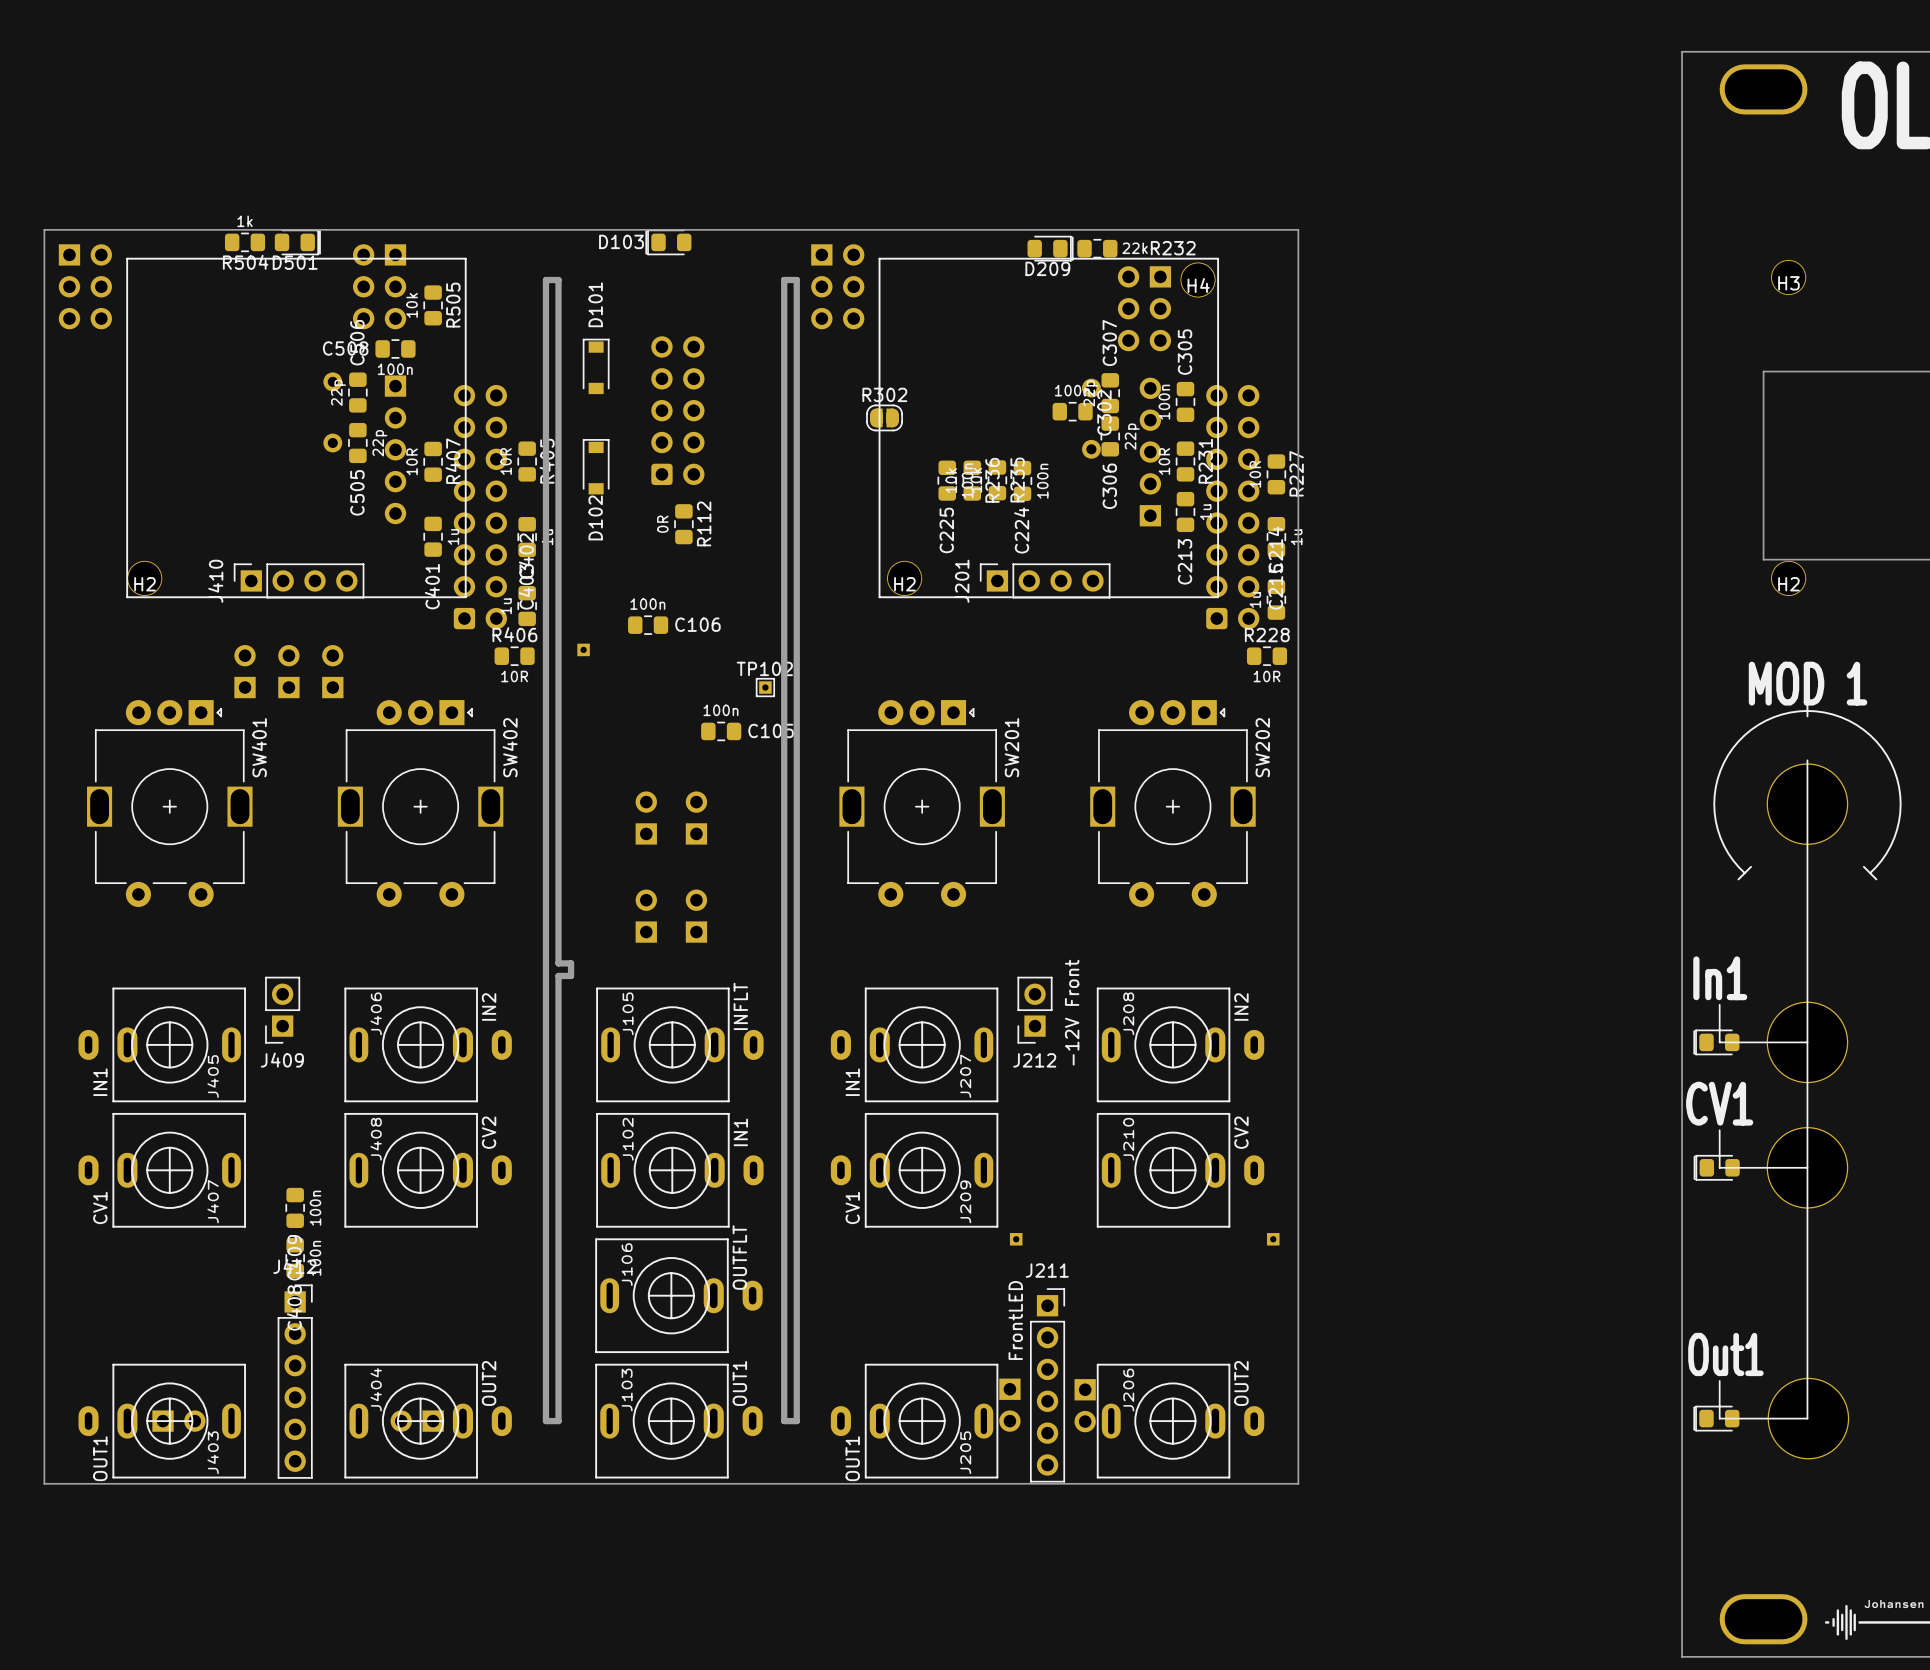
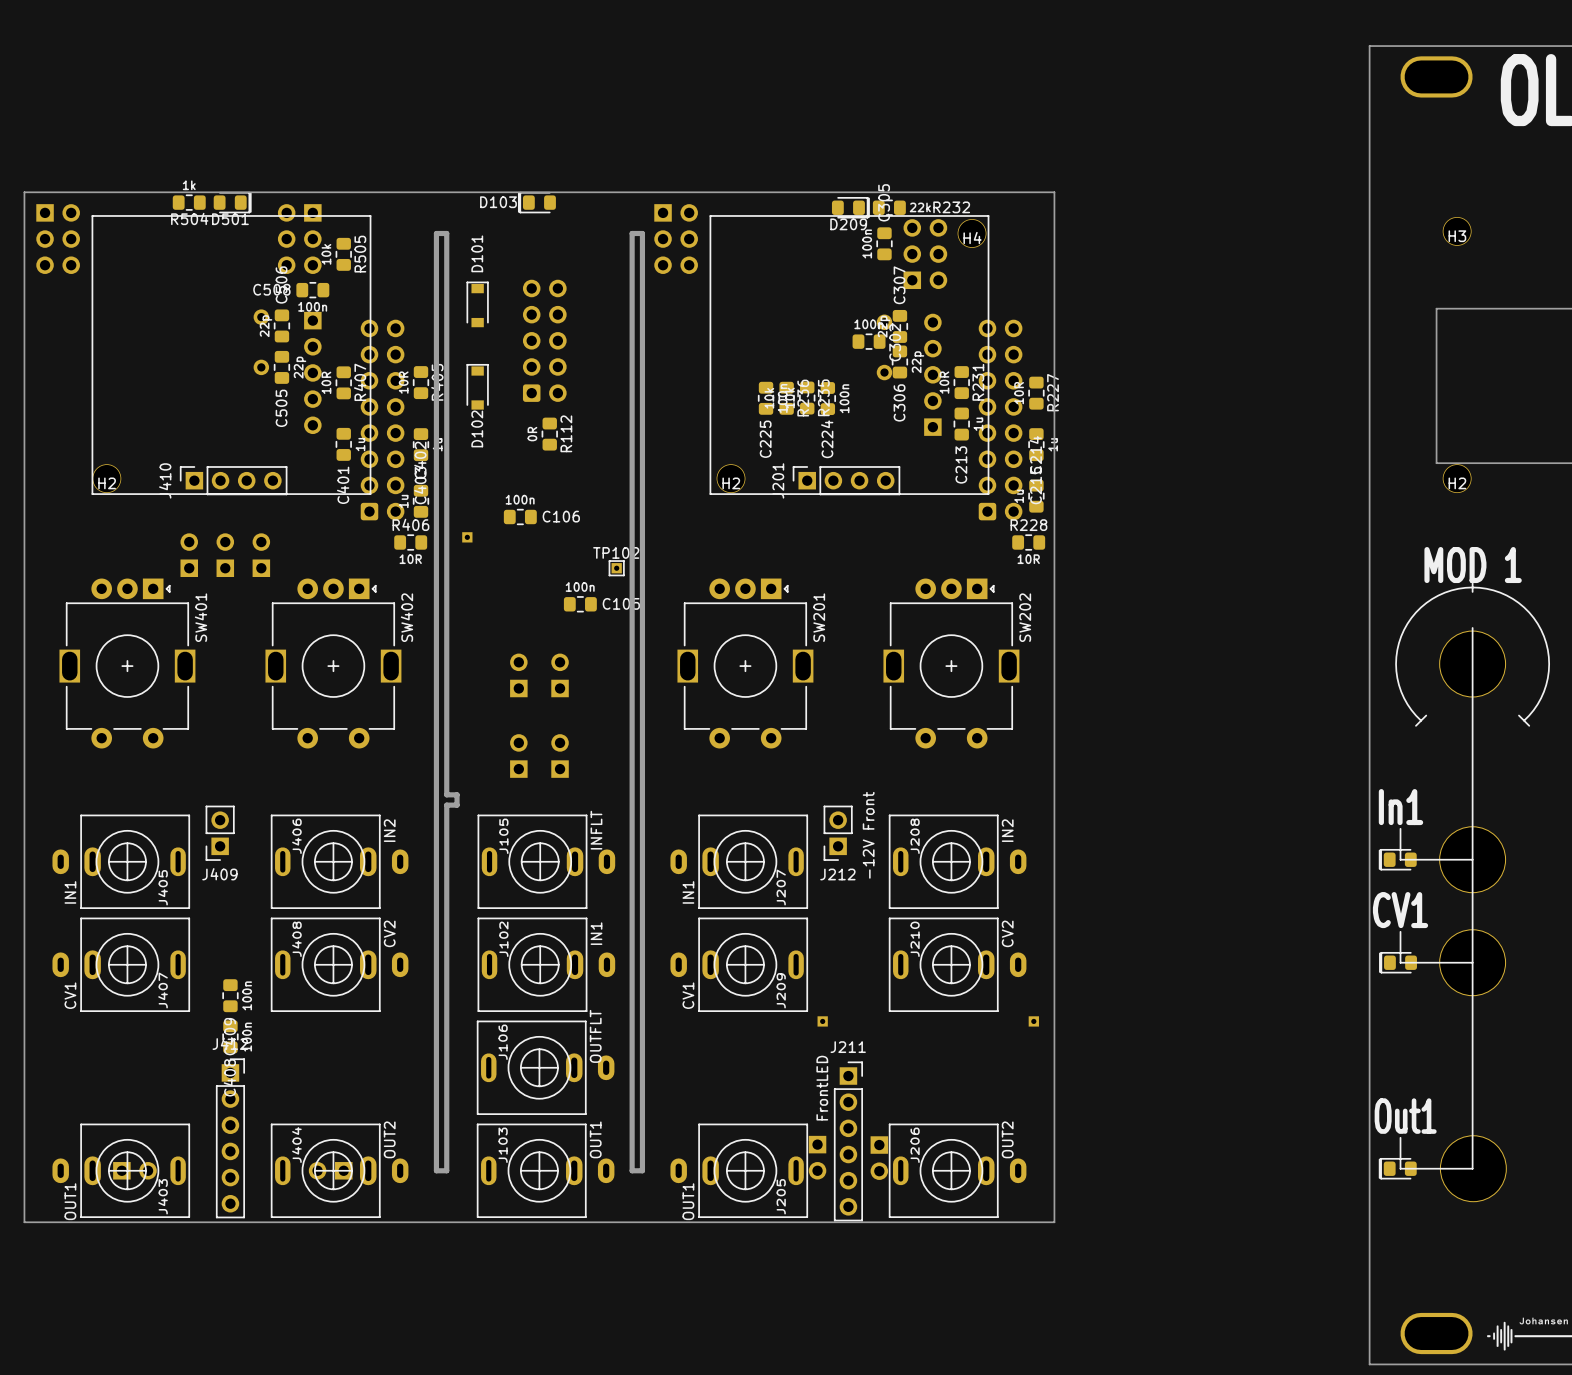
part rotation: 0° (1144, 308) -> 180° (925, 254)
C305 position: (1185, 401) -> (884, 243)
R302: (884, 417) -> none

